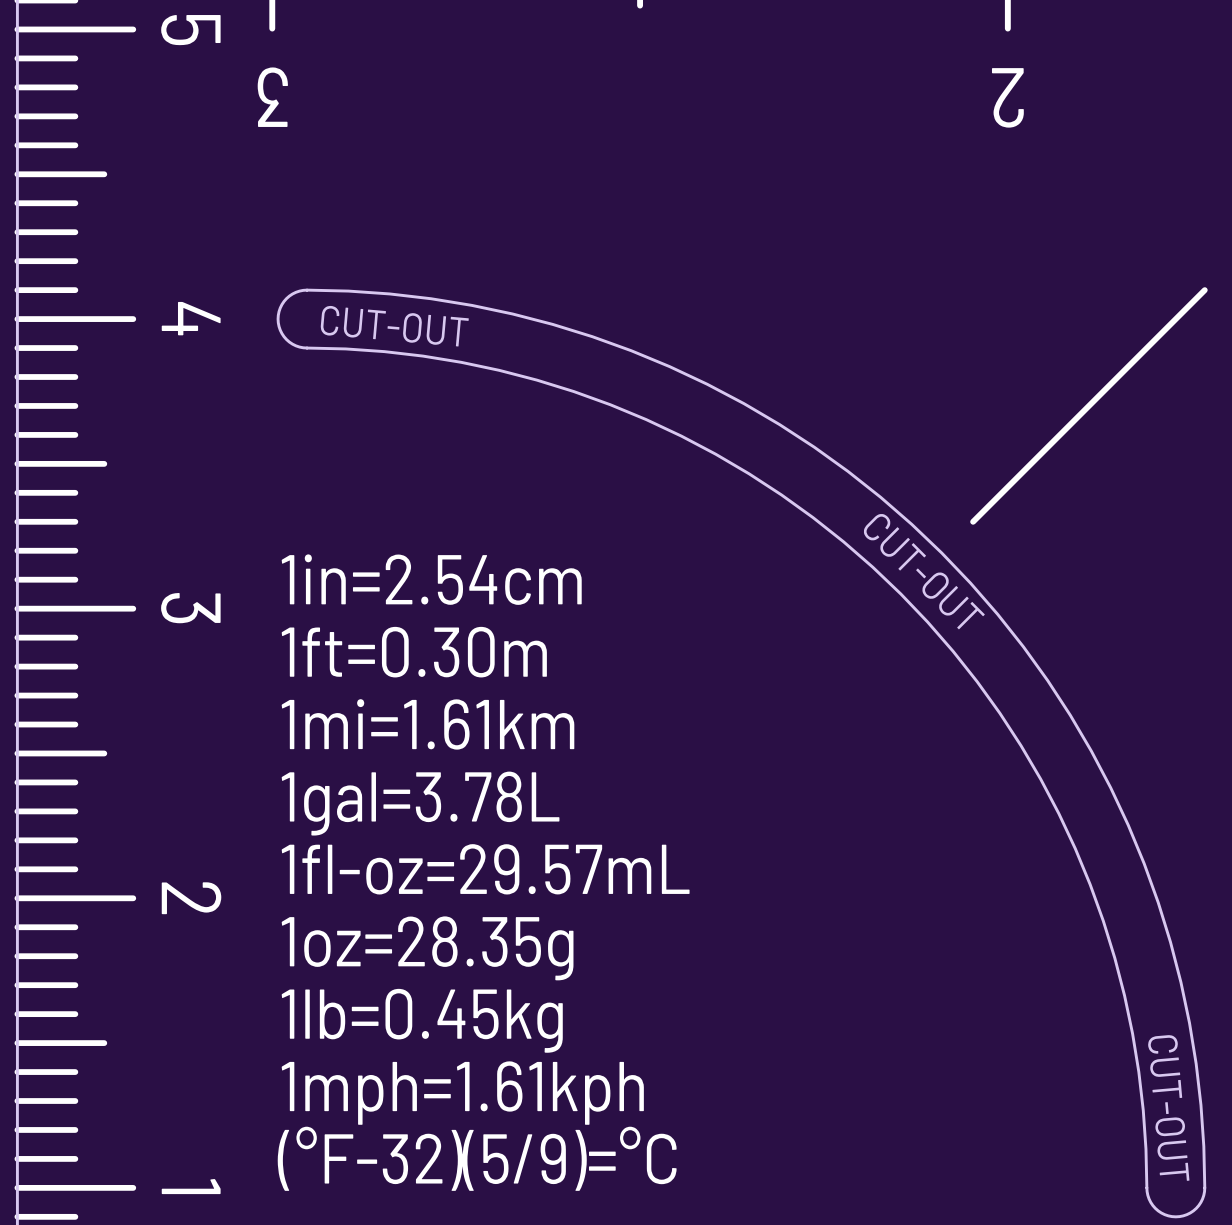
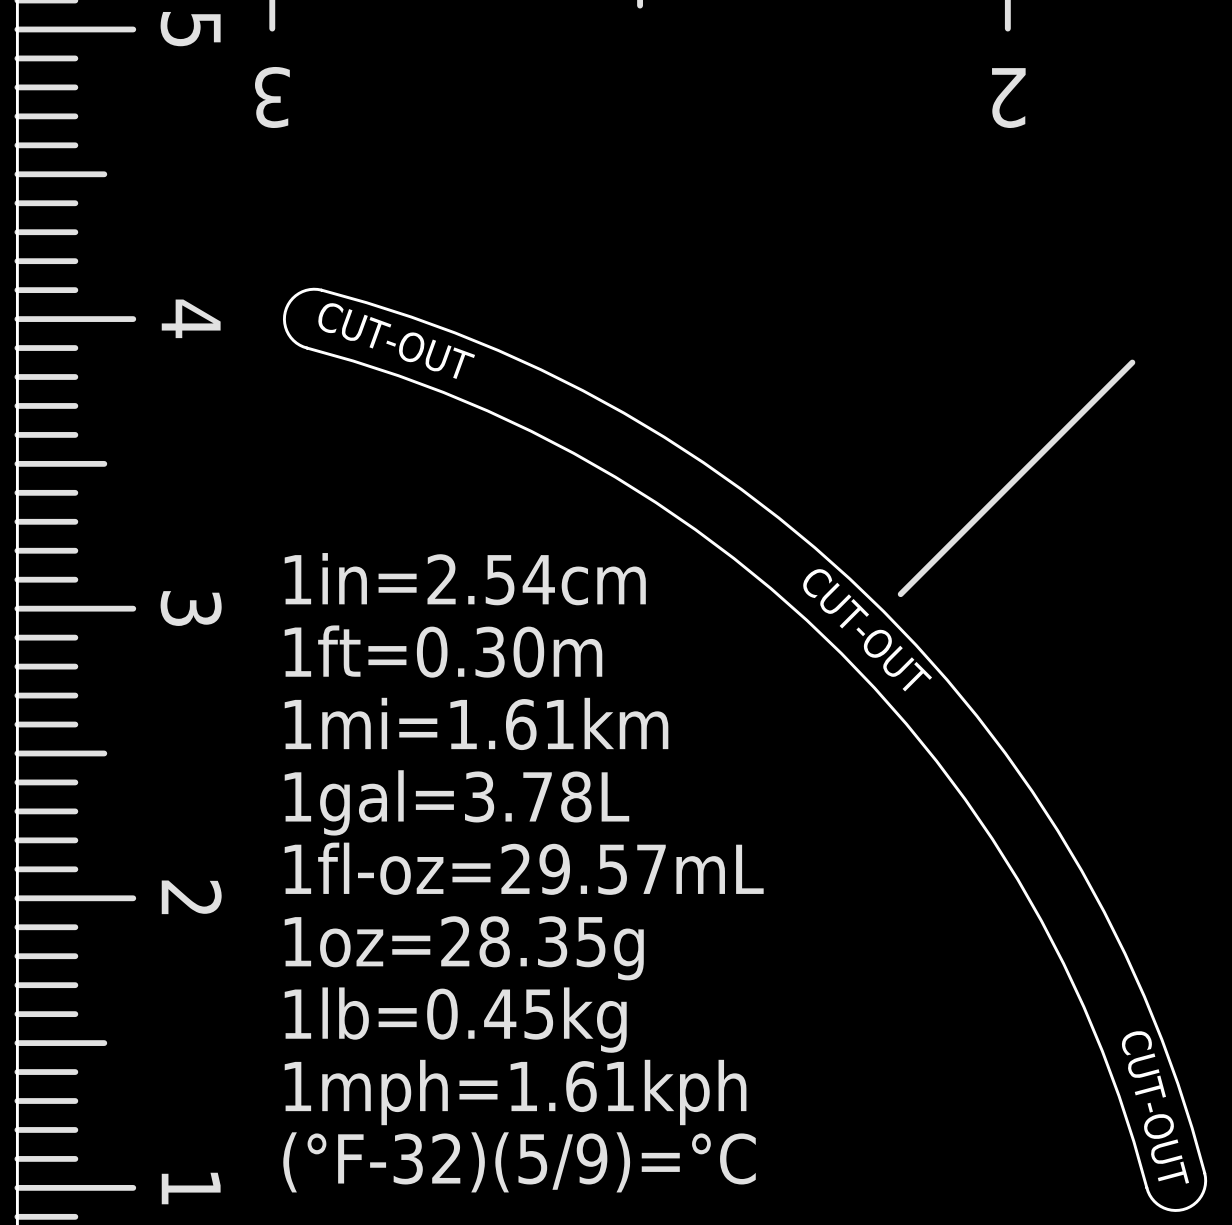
board edge: (307, 290) (389, 293) (471, 305) (512, 313) (592, 336) (669, 366) (743, 403) (814, 447) (880, 497) (941, 553) (997, 614) (1047, 680) (1070, 715) (1110, 787) (1144, 863) (1158, 902) (1180, 982) (1196, 1063) (1200, 1105) (1204, 1187) (1202, 1198) (1196, 1208) (1183, 1215) (1168, 1215) (1158, 1210) (1149, 1198) (1138, 1071) (1124, 995) (1103, 920) (1075, 848) (1058, 813) (1021, 745) (999, 713) (953, 651) (900, 594) (843, 541) (781, 495) (749, 473) (681, 436) (610, 404) (536, 380) (461, 362) (384, 351) (303, 347) (292, 344) (280, 330) (279, 311) (289, 296) (307, 290) -> (321, 290) (309, 289) (298, 293) (290, 301) (286, 308) (284, 315) (285, 327) (290, 337) (296, 343) (307, 348) (398, 375) (487, 410) (531, 431) (615, 477) (695, 529) (770, 588) (841, 653) (874, 688) (906, 723) (965, 799) (1017, 879) (1041, 921) (1063, 963) (1102, 1051) (1119, 1096) (1149, 1195) (1157, 1204) (1171, 1210) (1186, 1208) (1196, 1202) (1204, 1188) (1205, 1177) (1192, 1128) (1177, 1083) (1144, 996) (1104, 911) (1057, 830) (1032, 791) (976, 716) (916, 645) (849, 578) (814, 547) (741, 489) (664, 437) (582, 390) (498, 350) (411, 316) (321, 290)
line: (1204, 290) (1132, 362) -> (973, 521) (900, 594)
text rotation: 0° (394, 326) -> 15° clockwise (396, 340)
text position: CUT-OUT (924, 571) -> CUT-OUT (867, 630)
text rotation: 0° (1168, 1107) -> 10° counterclockwise (1154, 1106)

